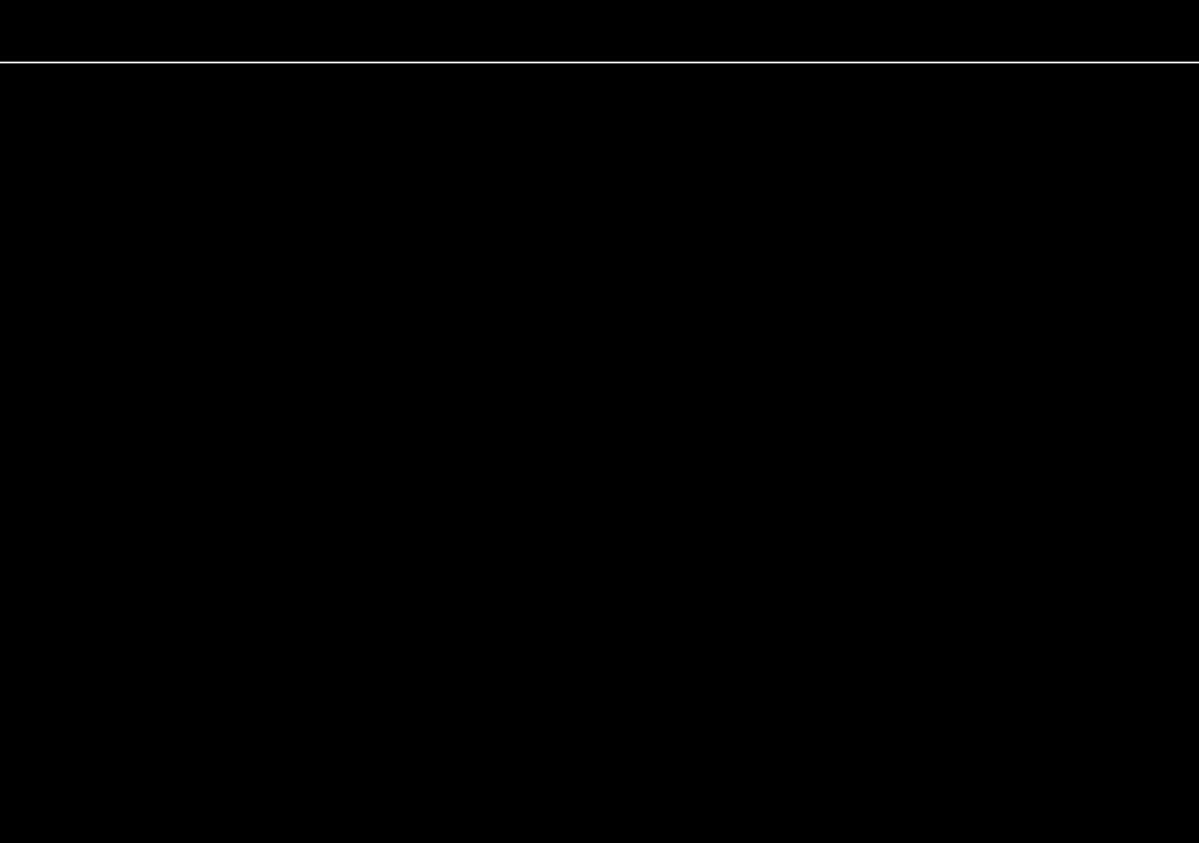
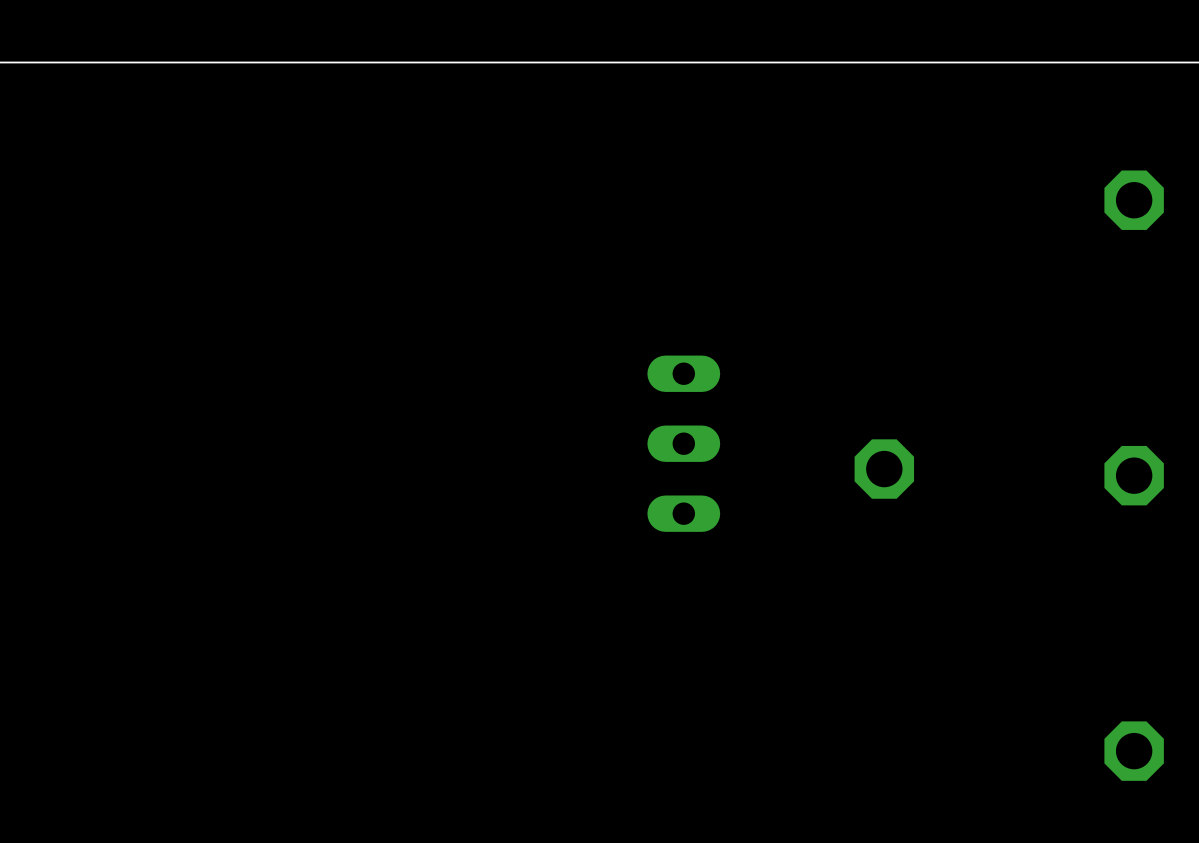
part: none -> (1134, 200)
part: none -> (683, 443)
part: none -> (884, 469)
part: none -> (1134, 475)
part: none -> (1134, 751)

